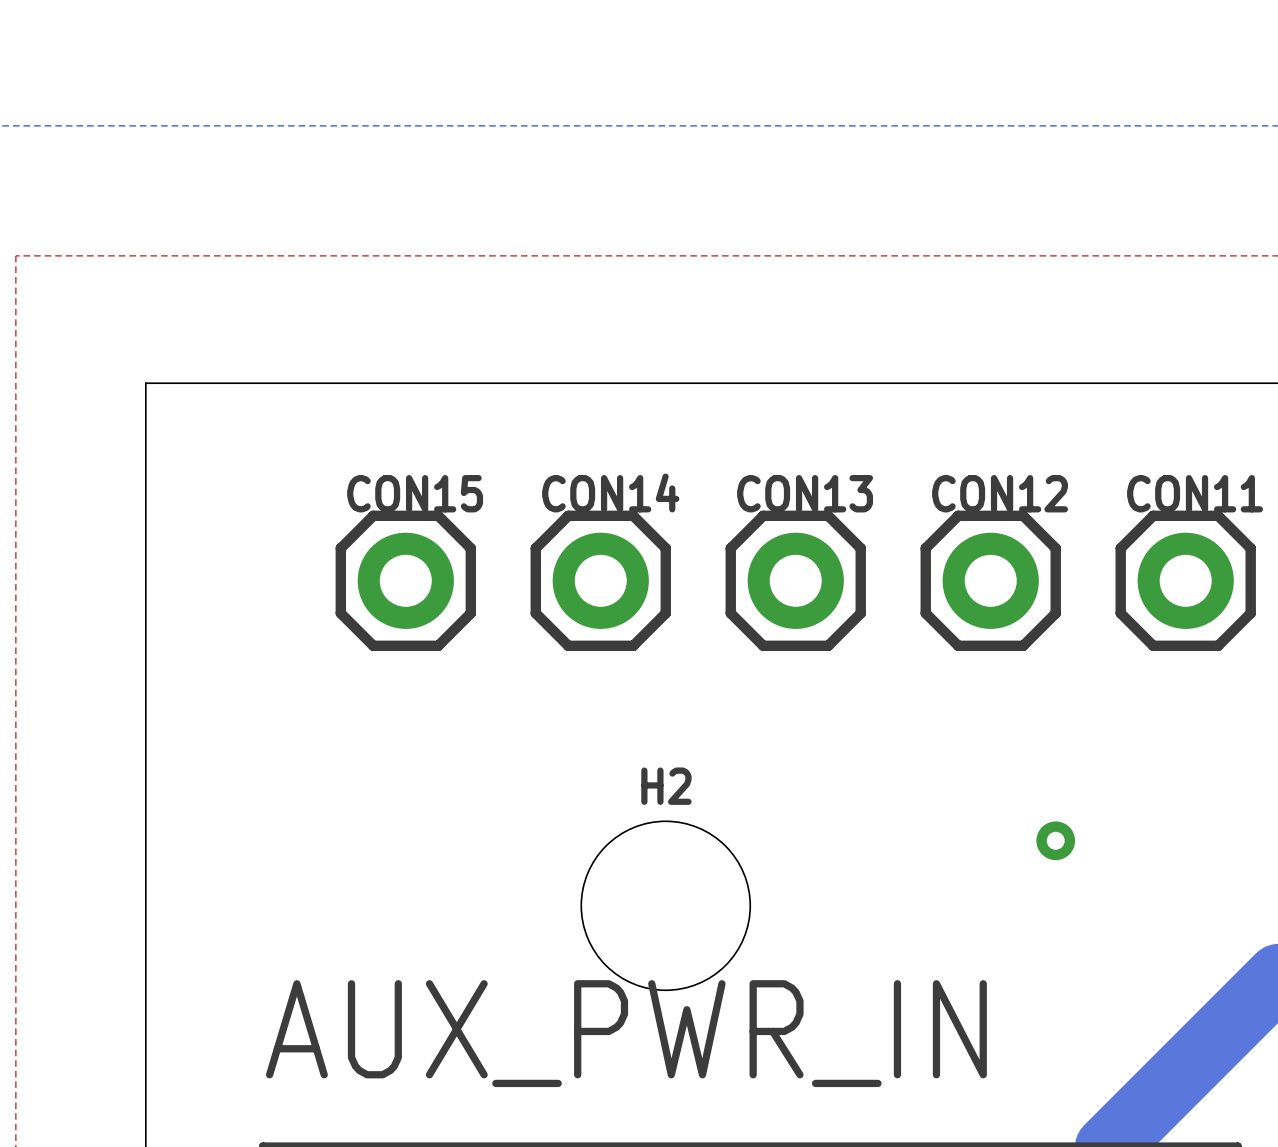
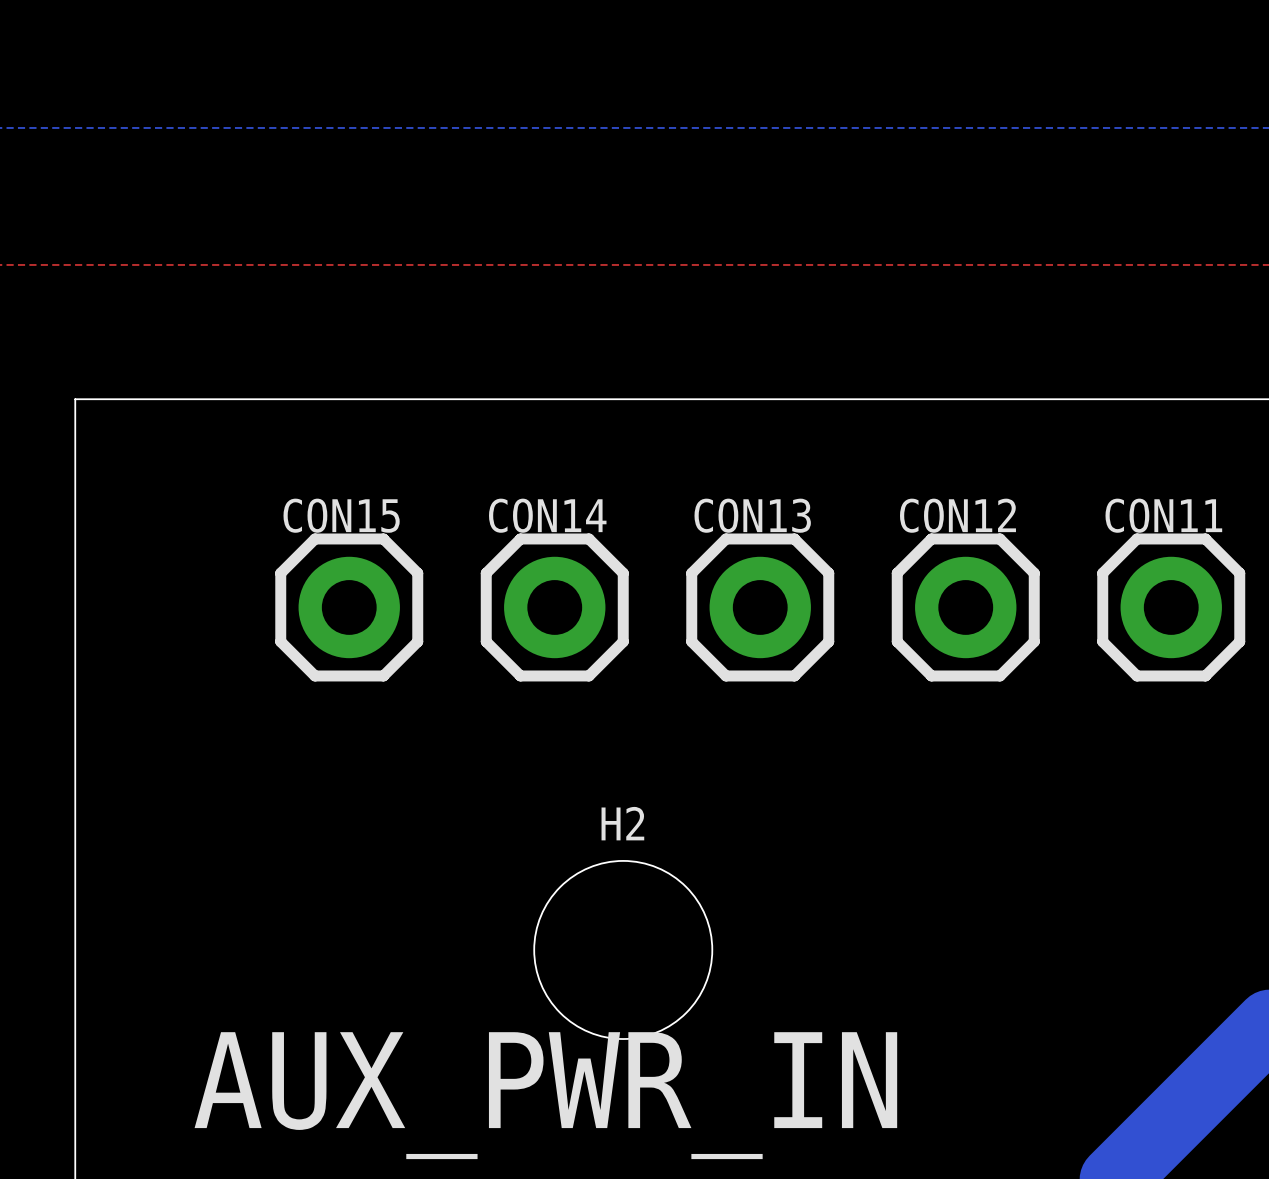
via: (1055, 840) -> none

